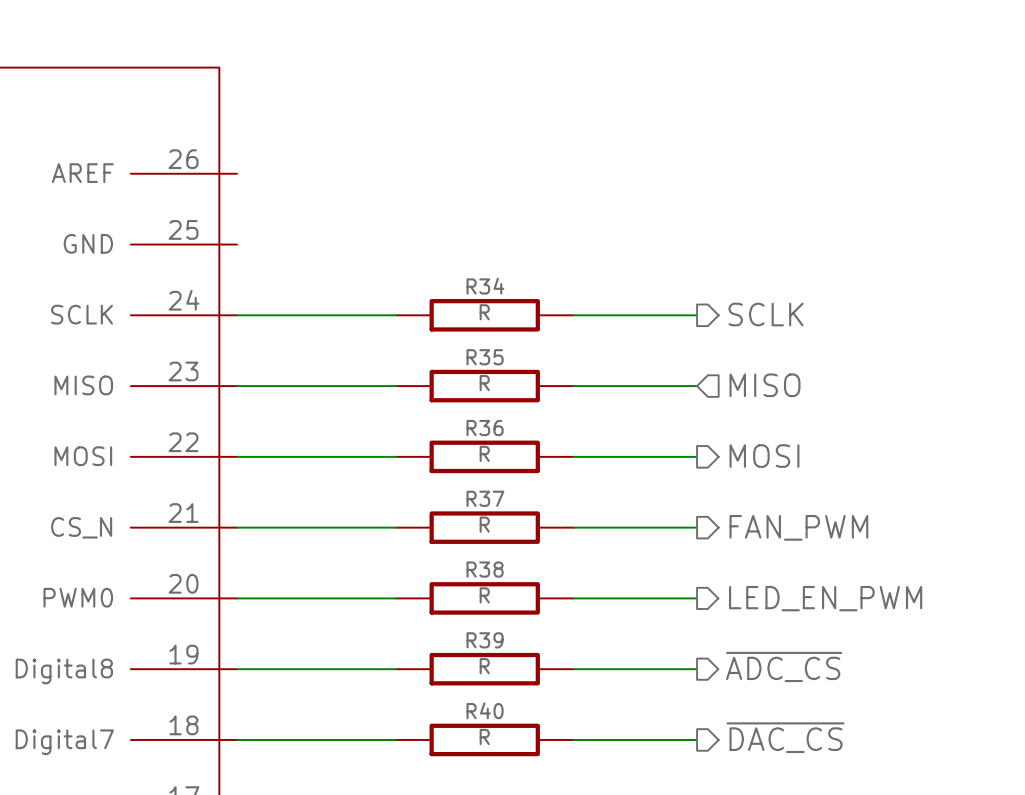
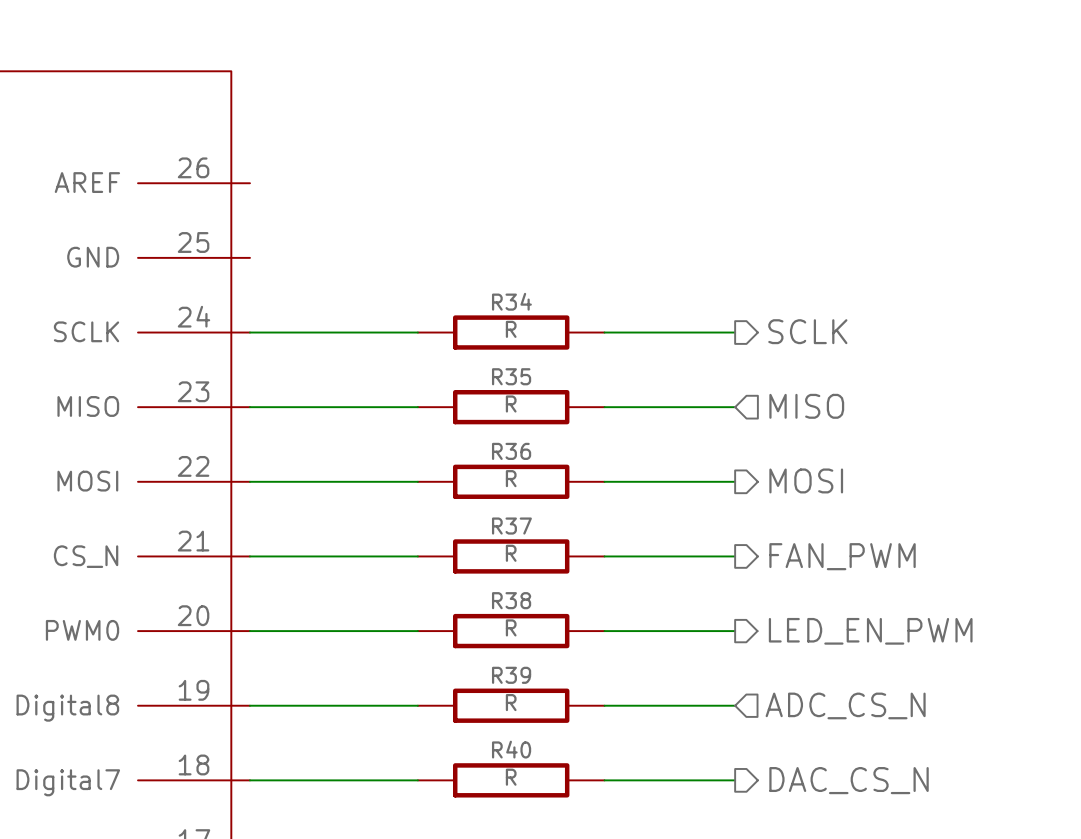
hierarchical label shape: output (784, 666) -> input (845, 705)
hierarchical label: ~{ADC_CS} (784, 666) -> ADC_CS_N (845, 705)
hierarchical label: ~{DAC_CS} (785, 737) -> DAC_CS_N (849, 780)

